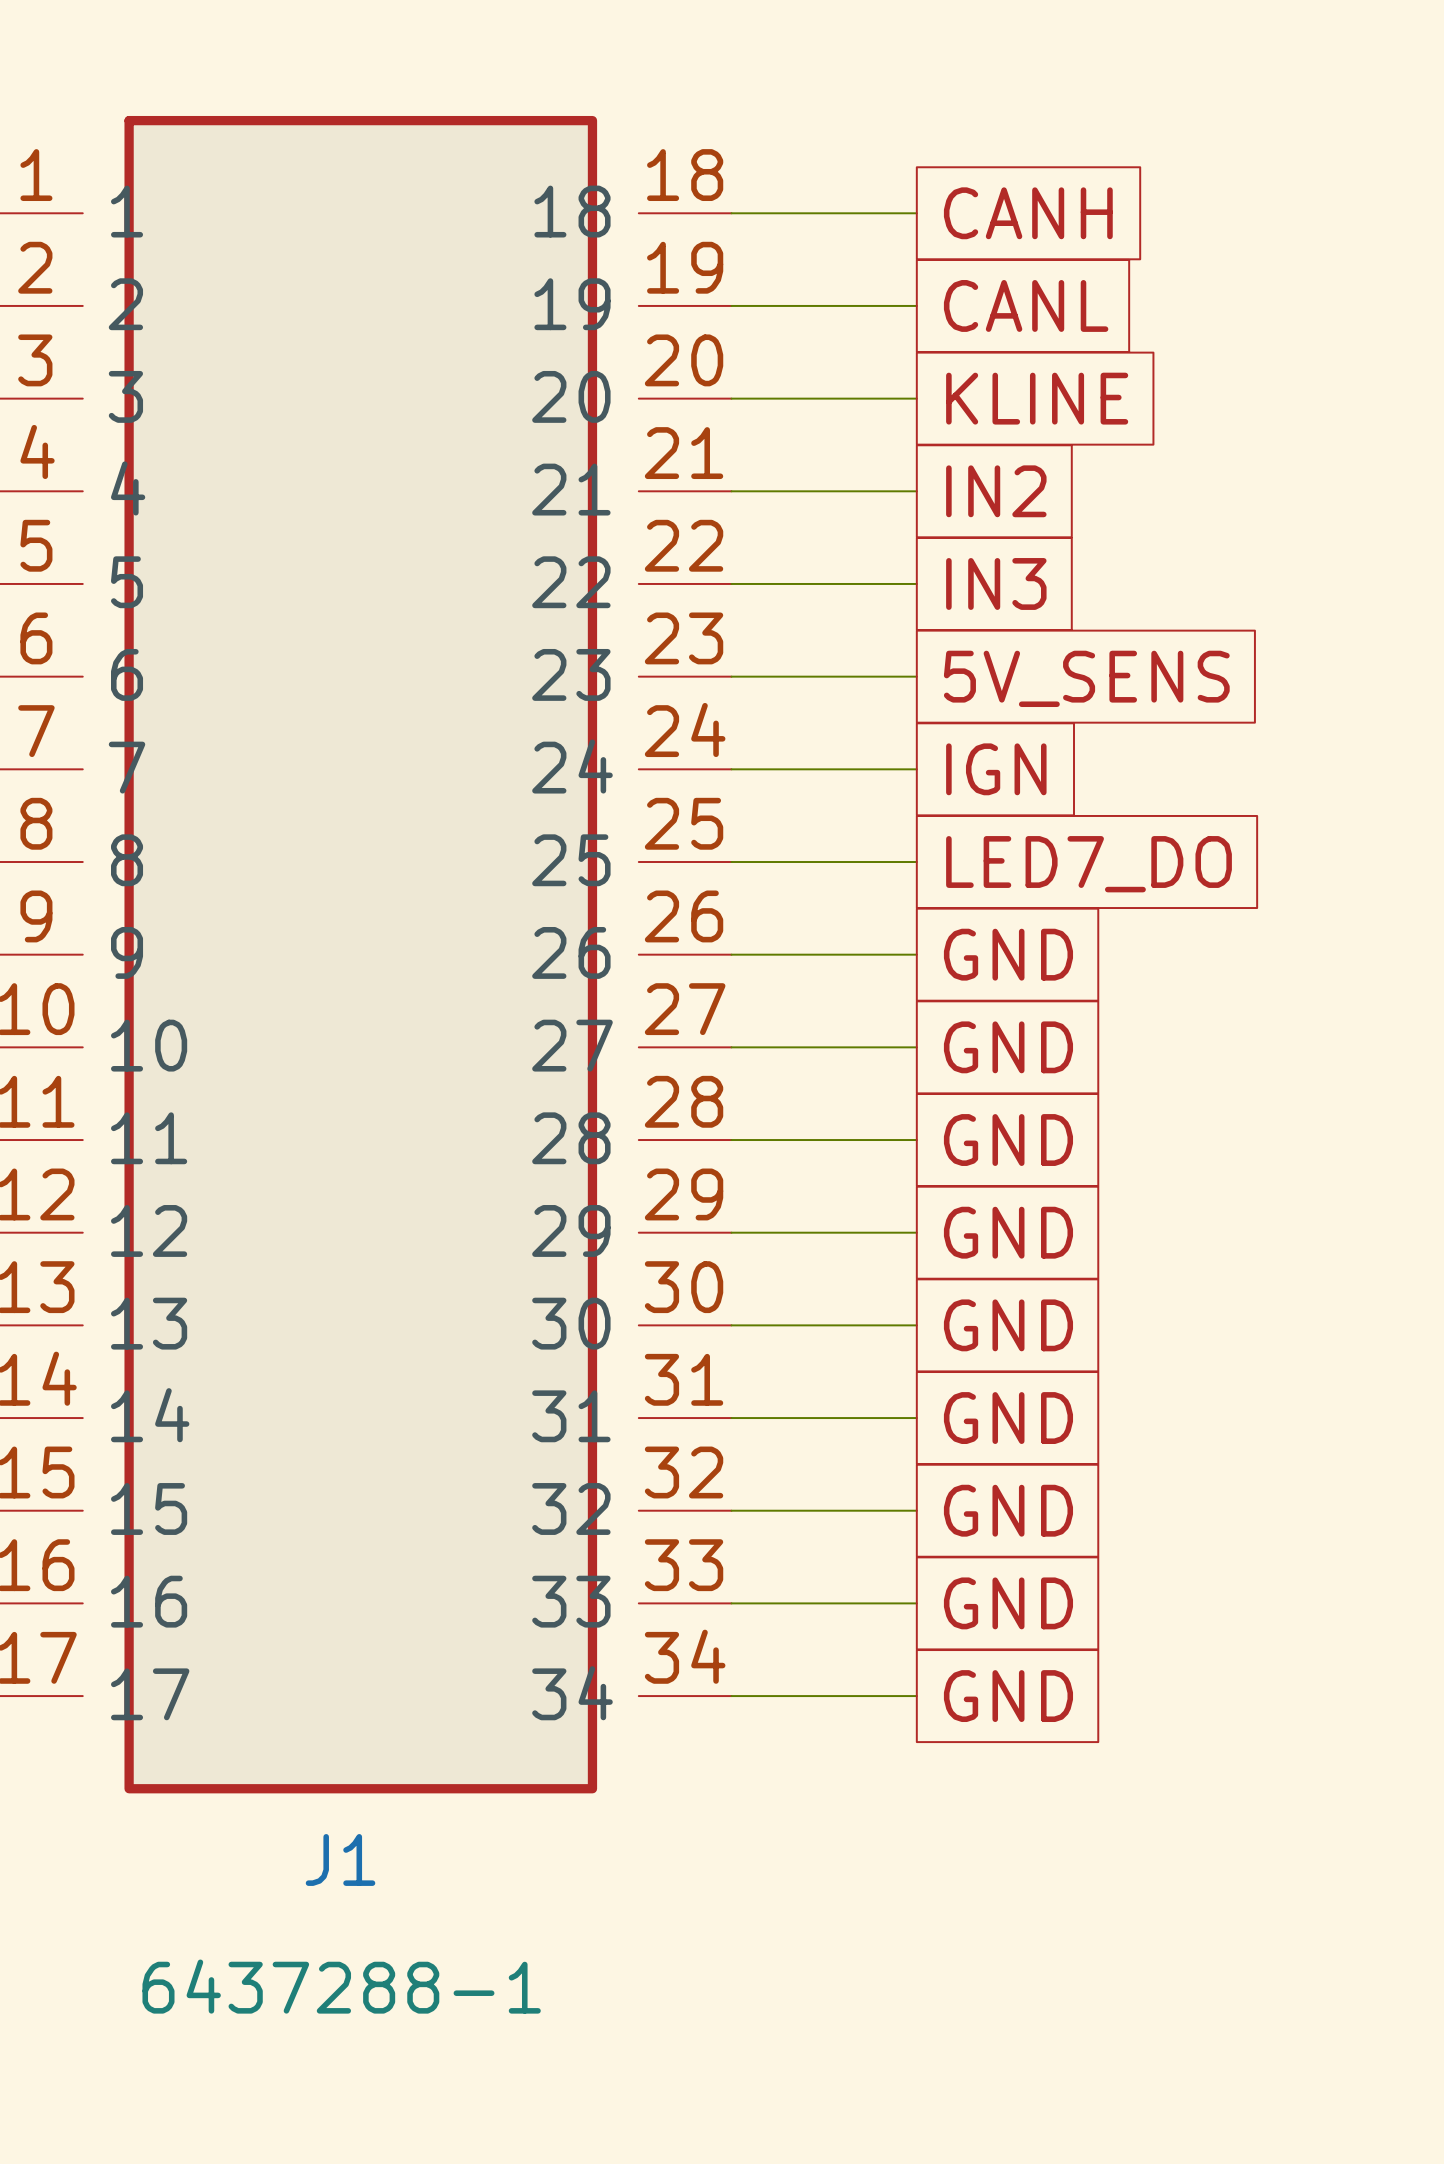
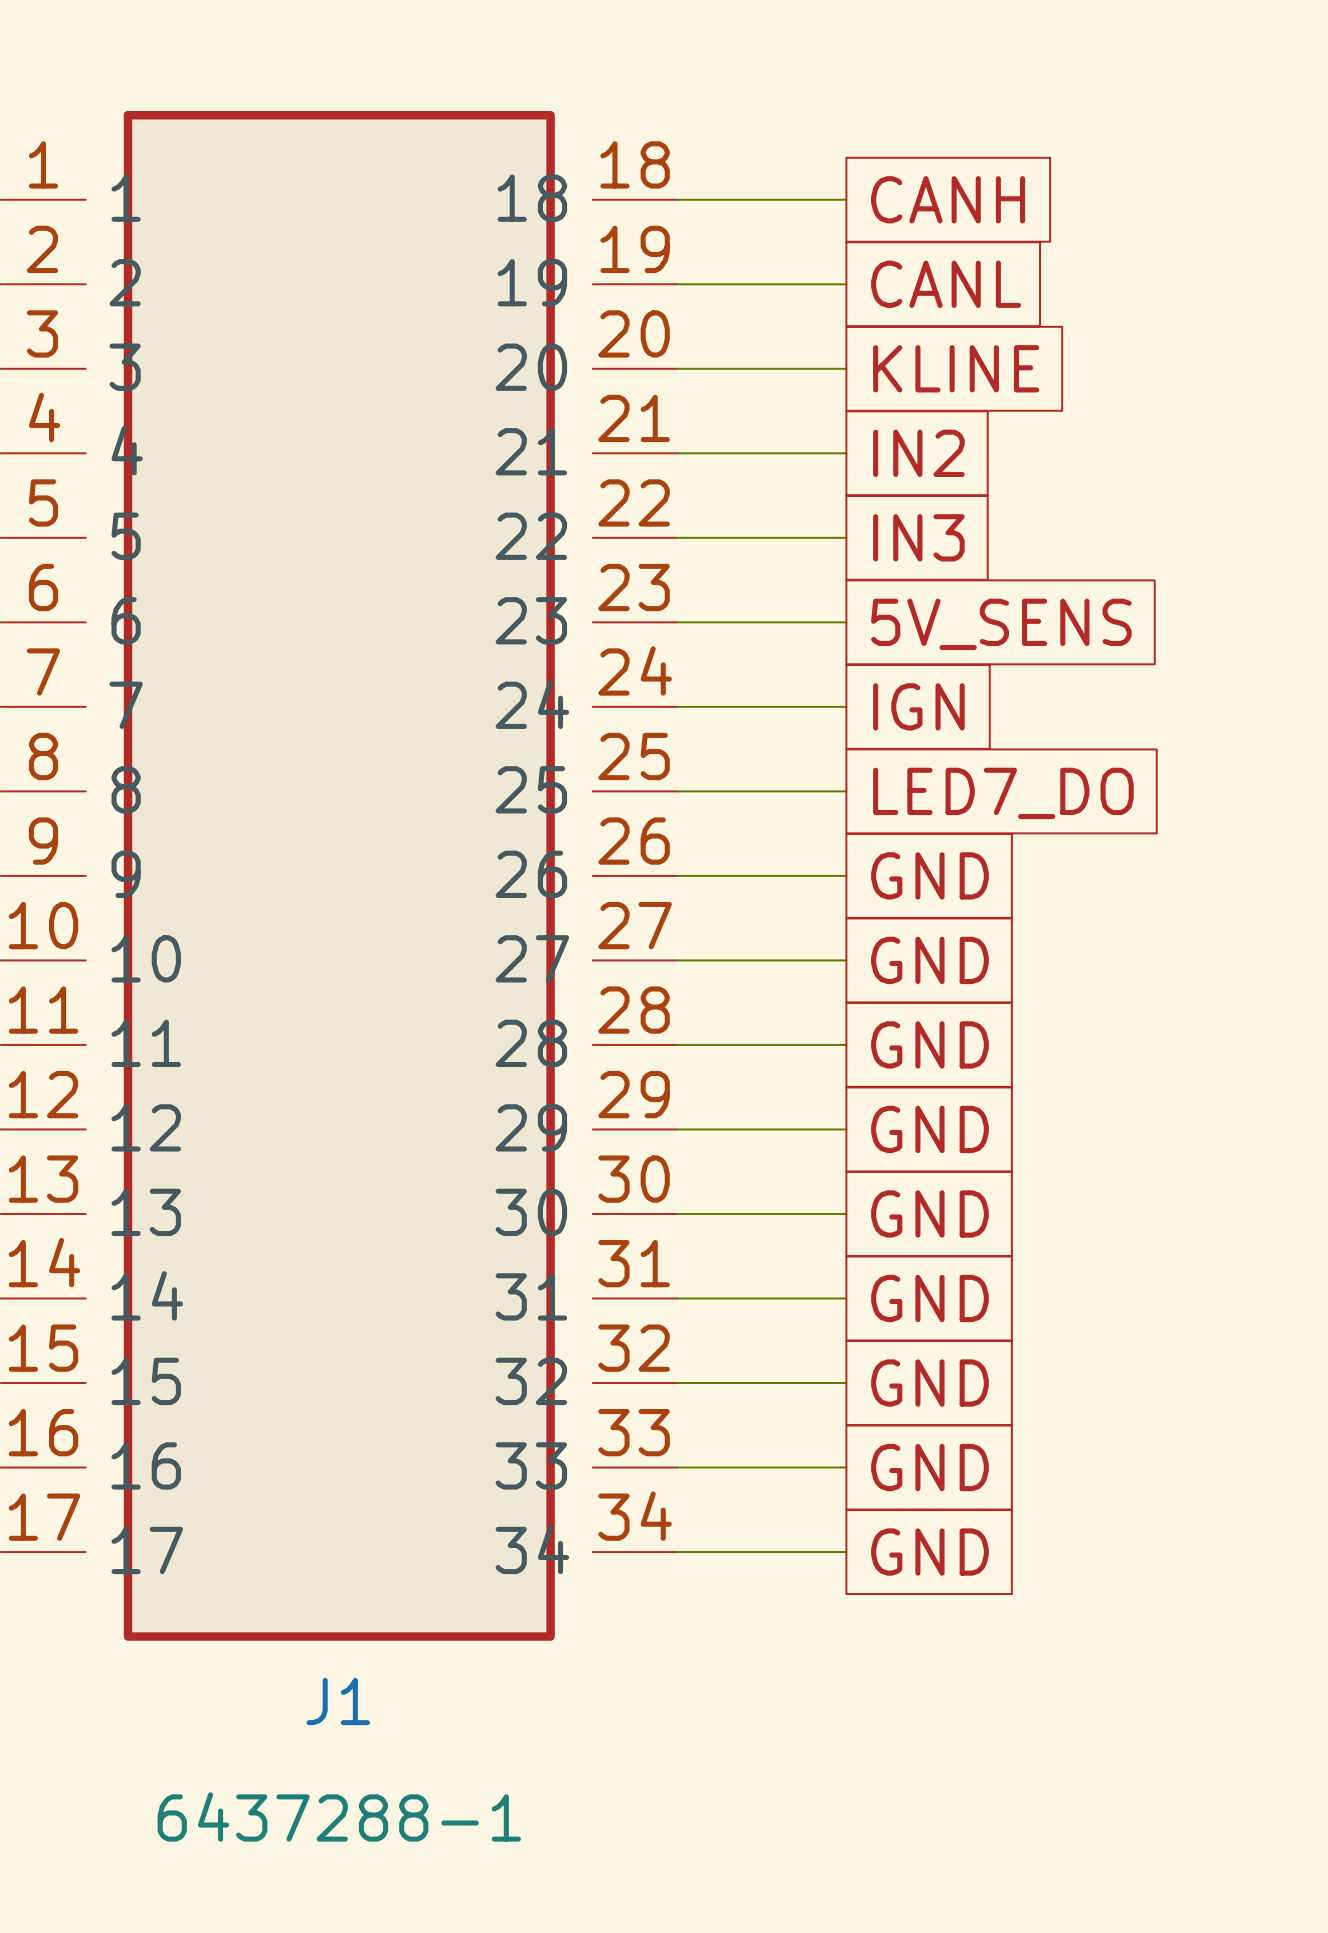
J1 name position: J1 (340, 1859) -> J1 (338, 1701)
J1 value position: 6437288-1 (341, 1986) -> 6437288-1 (339, 1816)

